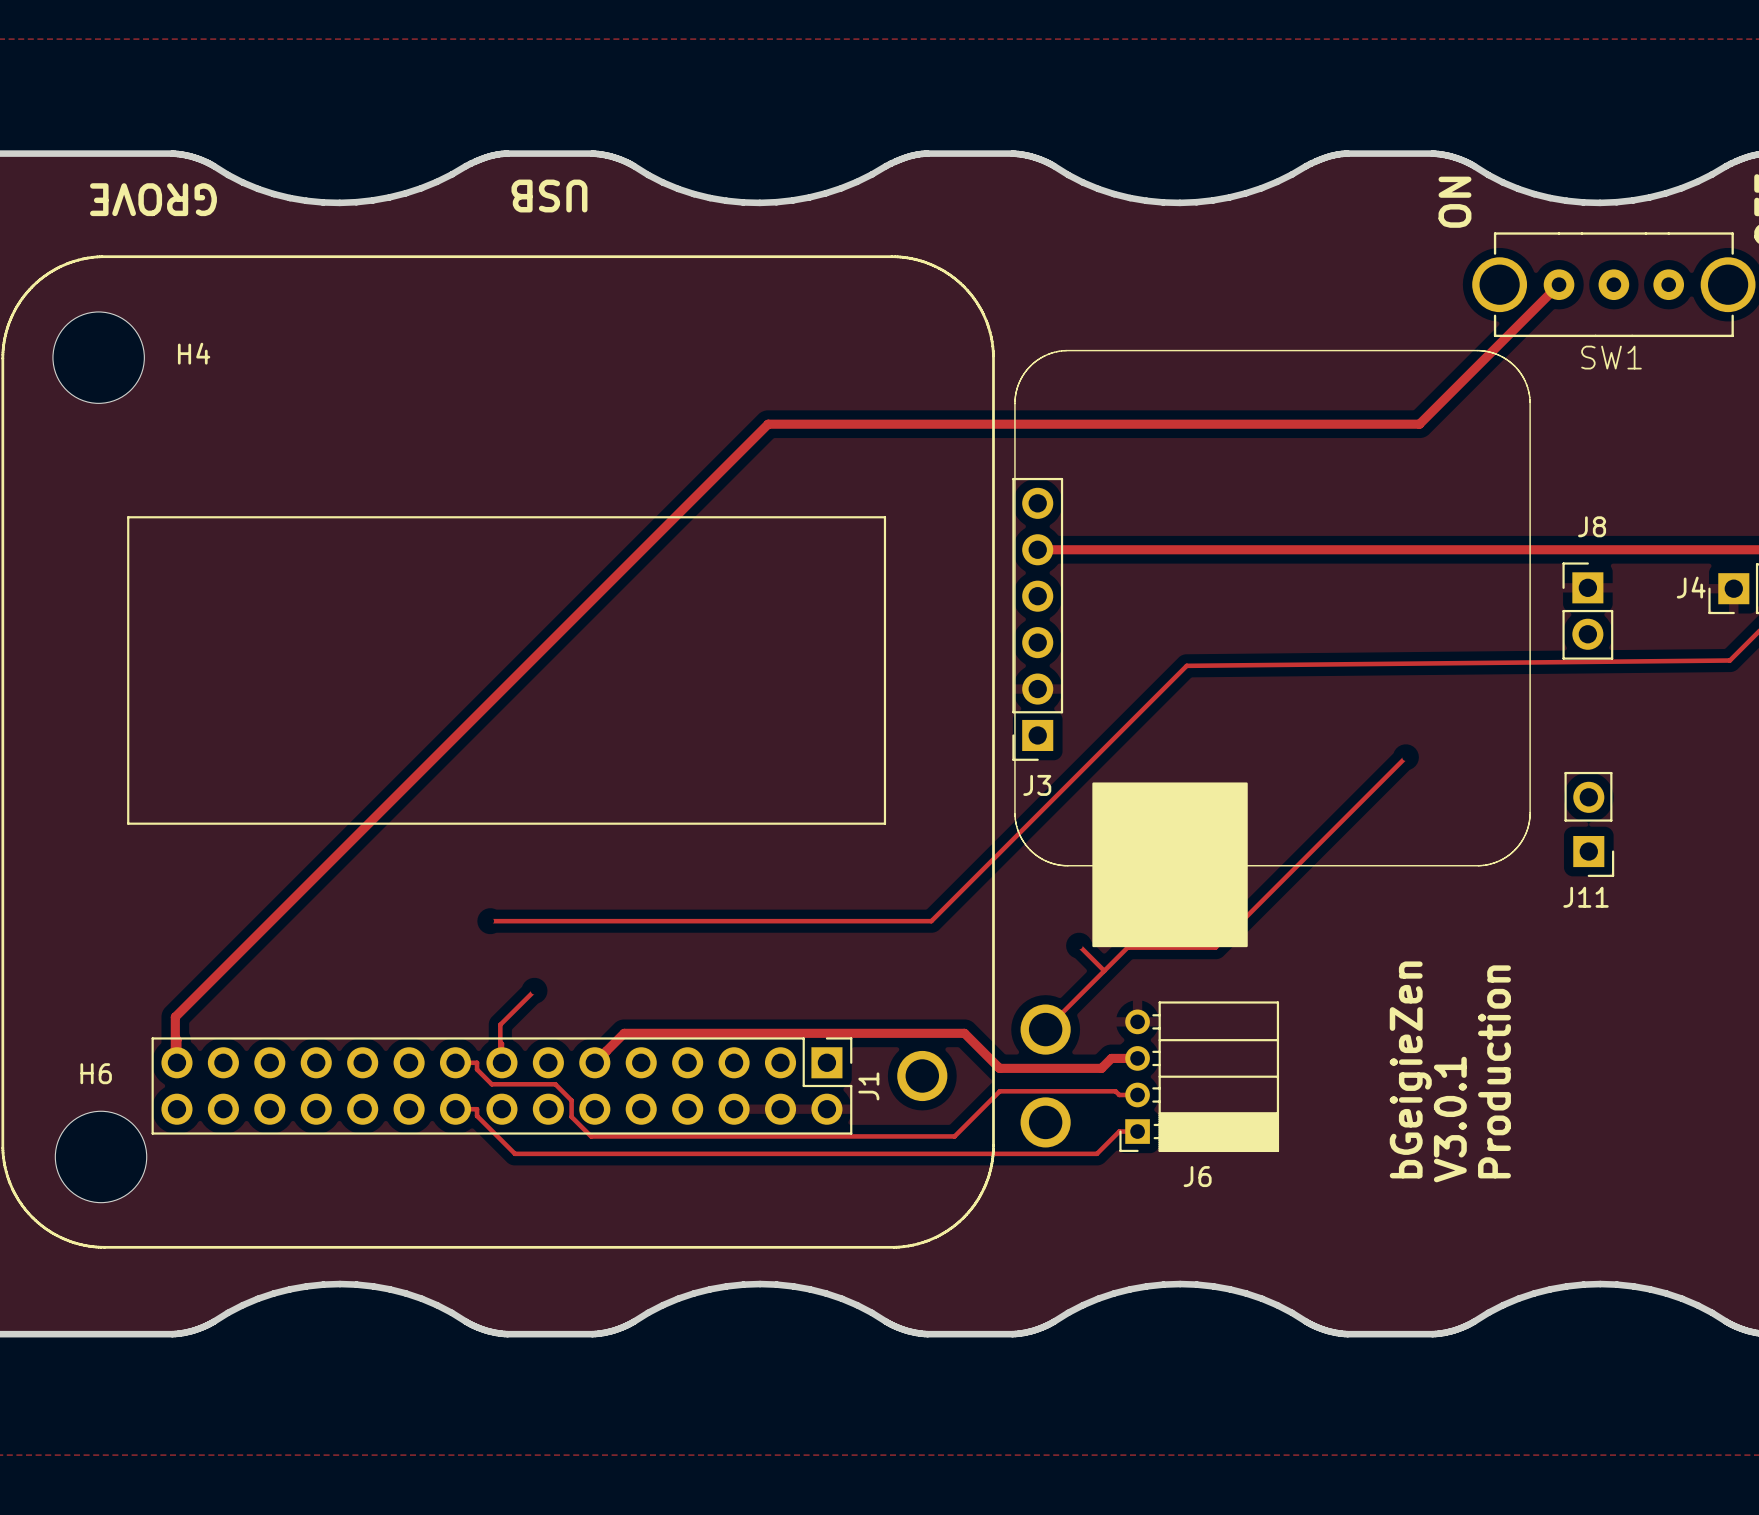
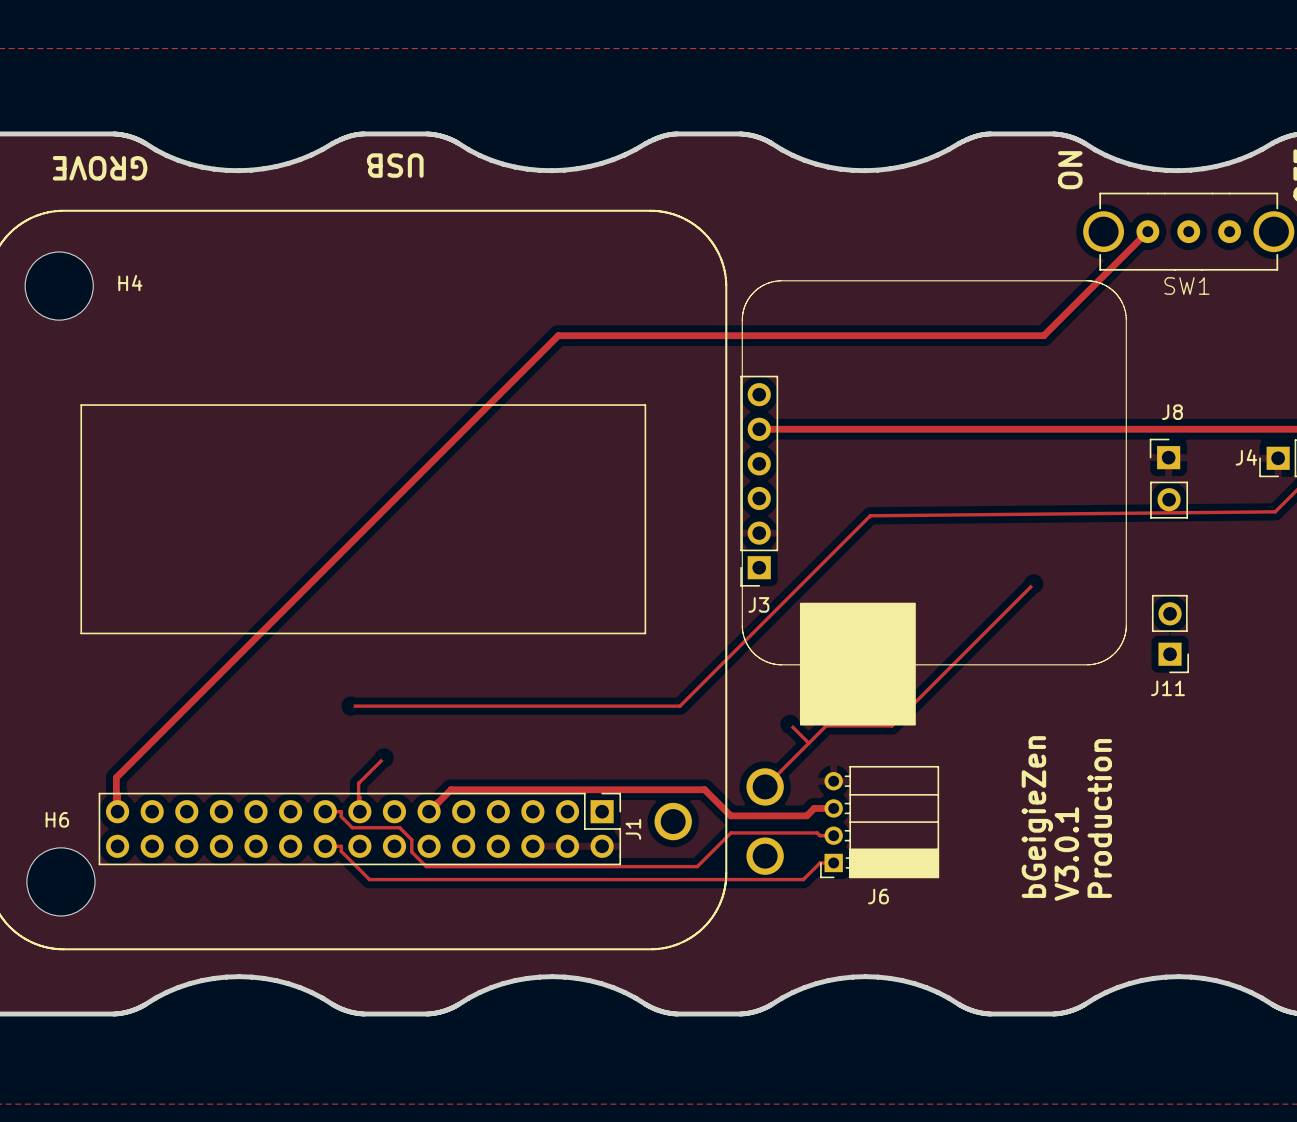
J8 footprint: [1562, 562, 1614, 660] -> [1149, 438, 1189, 519]

